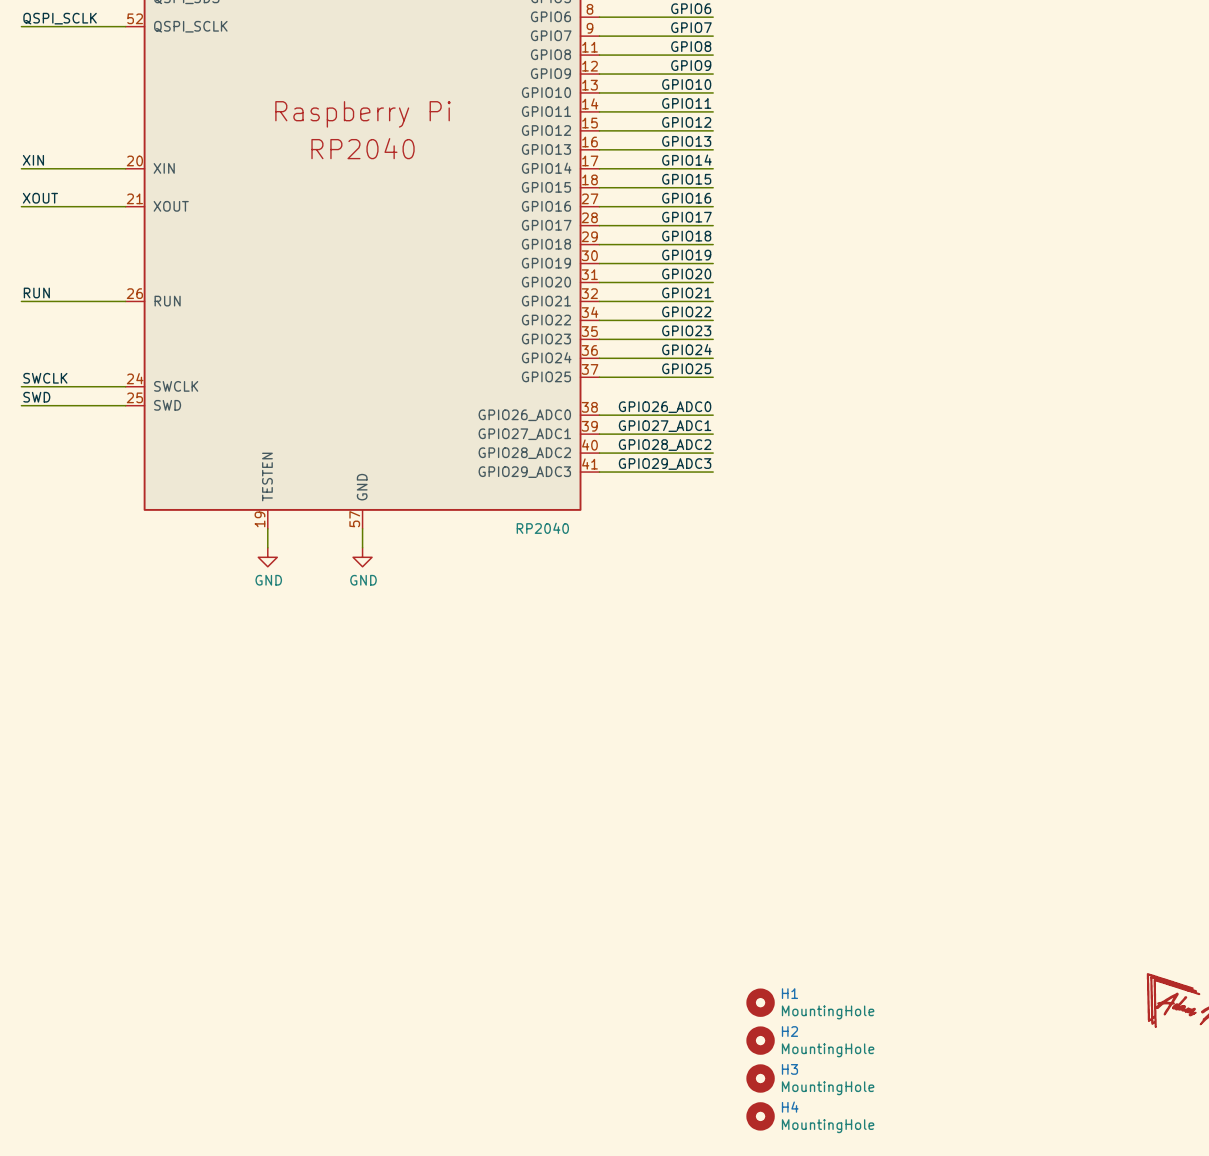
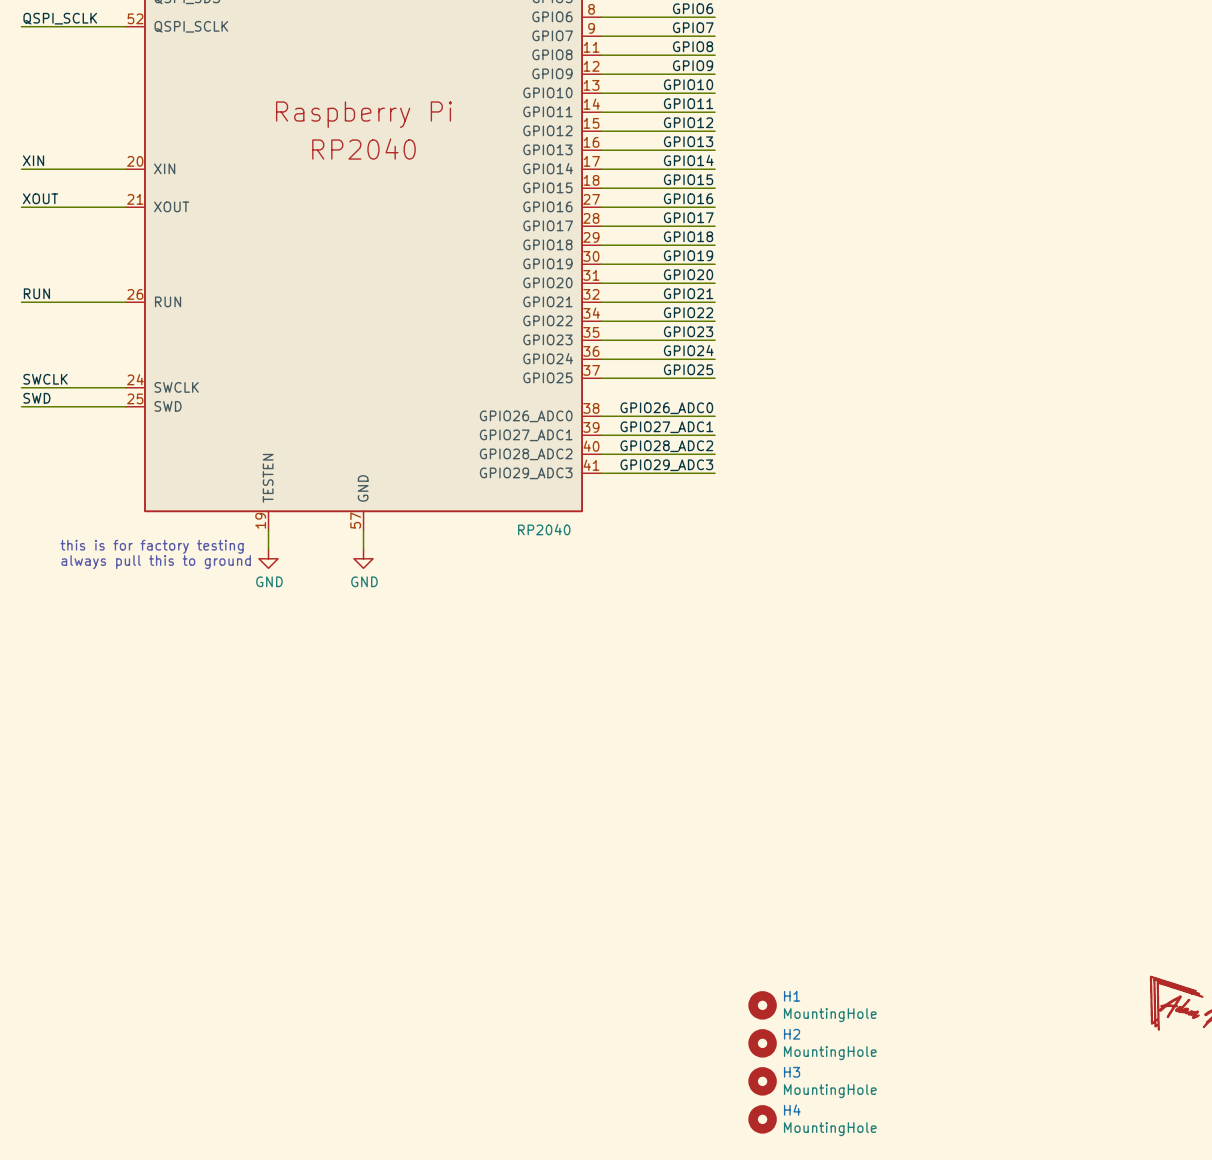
text: none -> this is for factory testing (152, 546)
text: none -> always pull this to ground (156, 562)

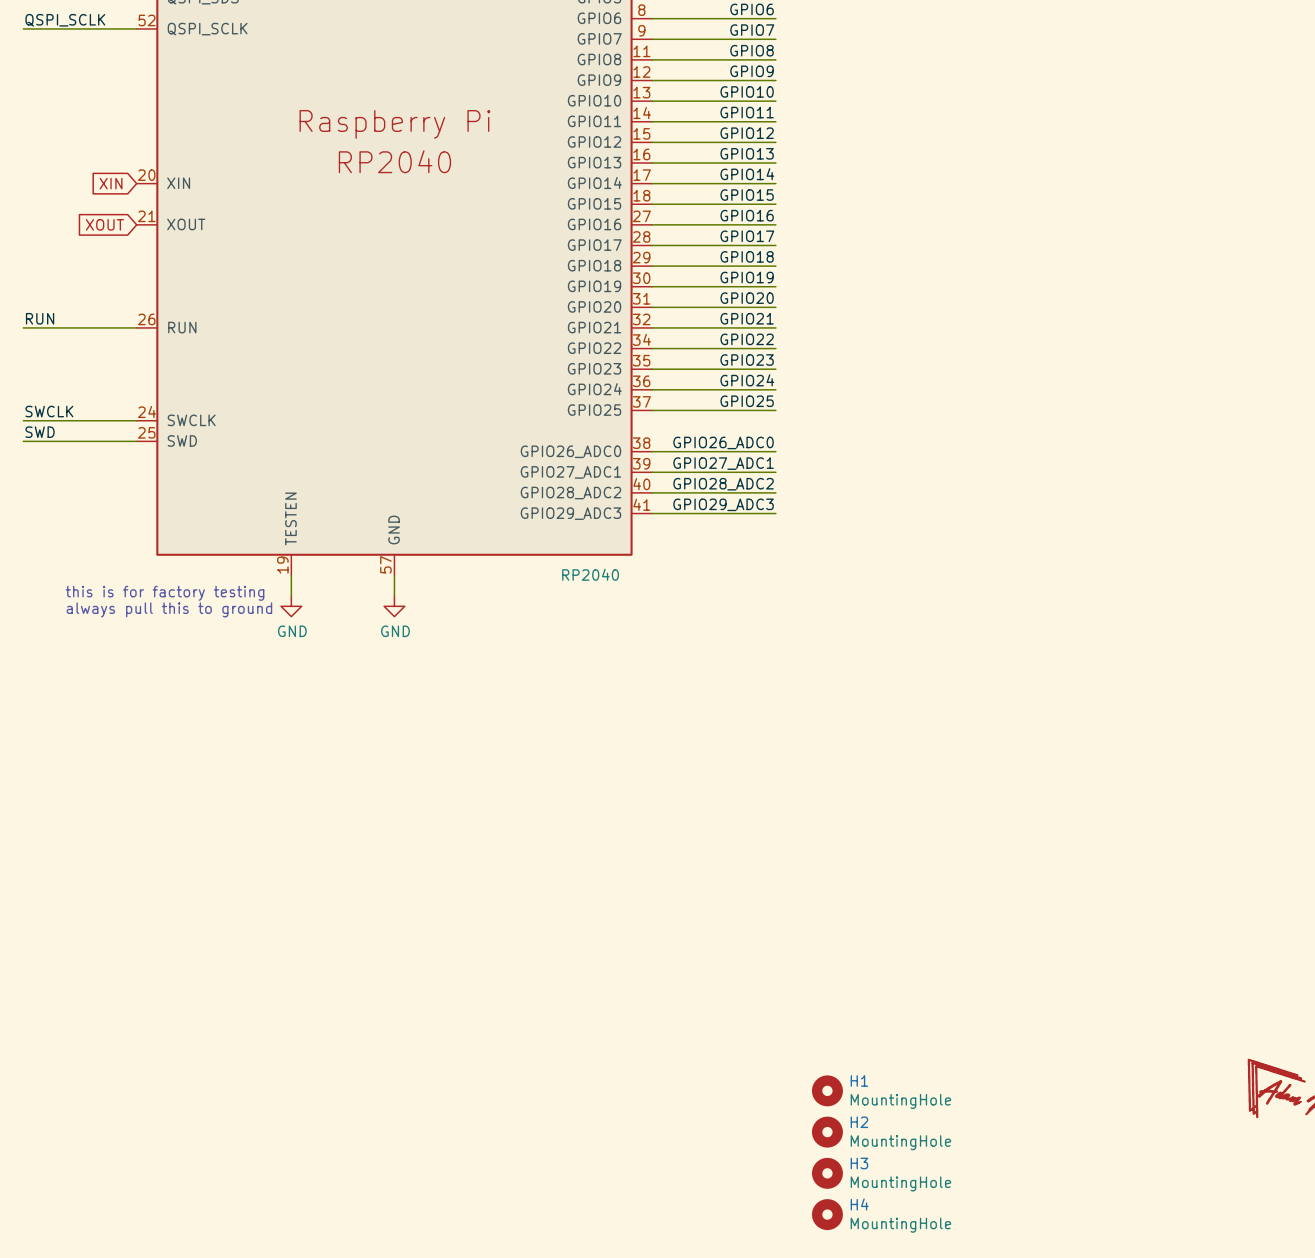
label: XIN (33, 160) -> none
wire: (21, 169) (125, 169) -> none
global label: none -> XIN (111, 183)
label: XOUT (40, 198) -> none
wire: (21, 207) (125, 207) -> none
global label: none -> XOUT (104, 224)

